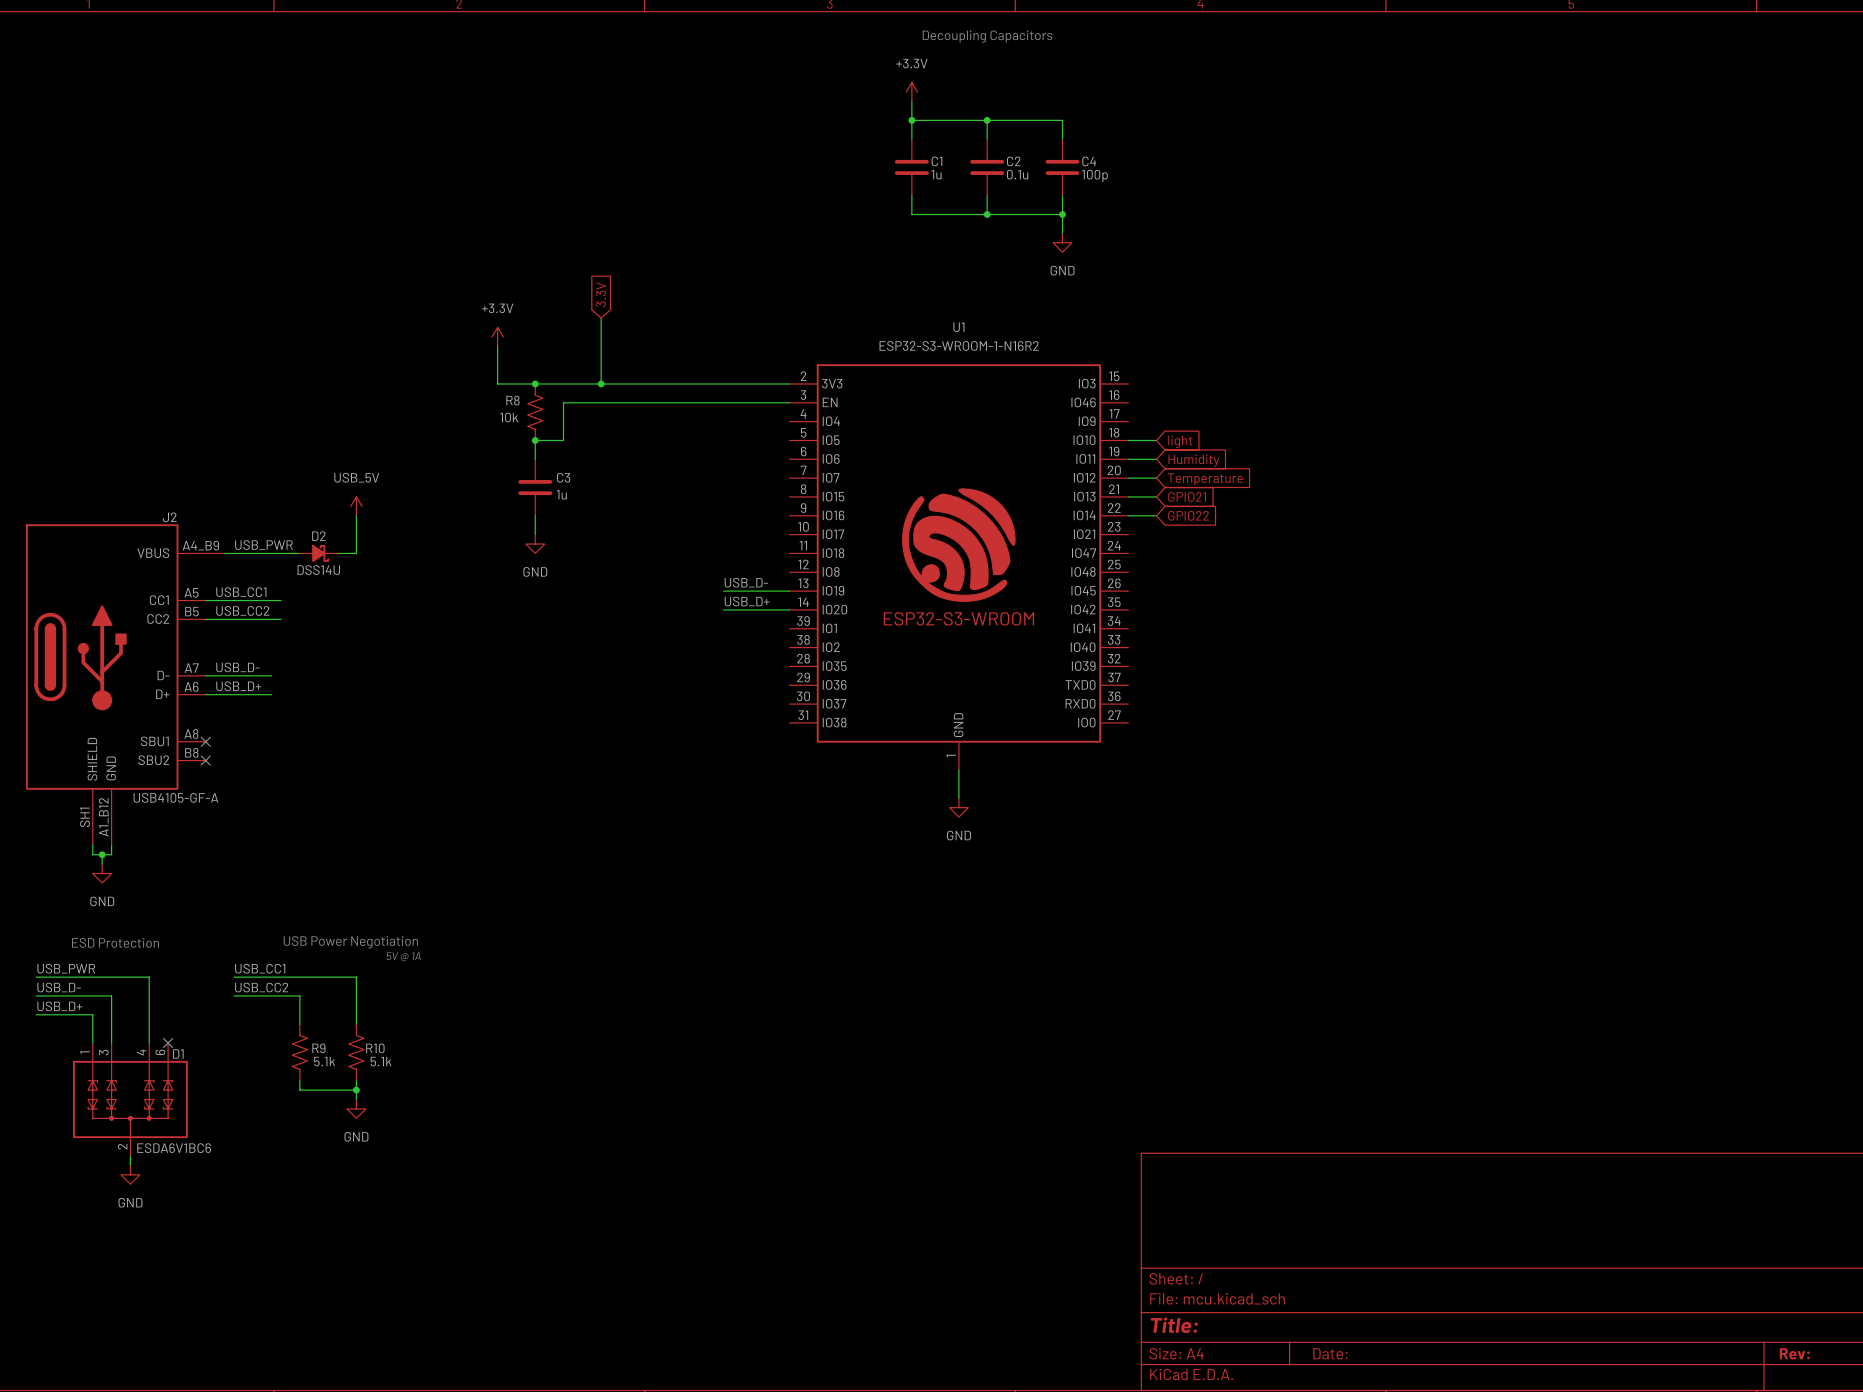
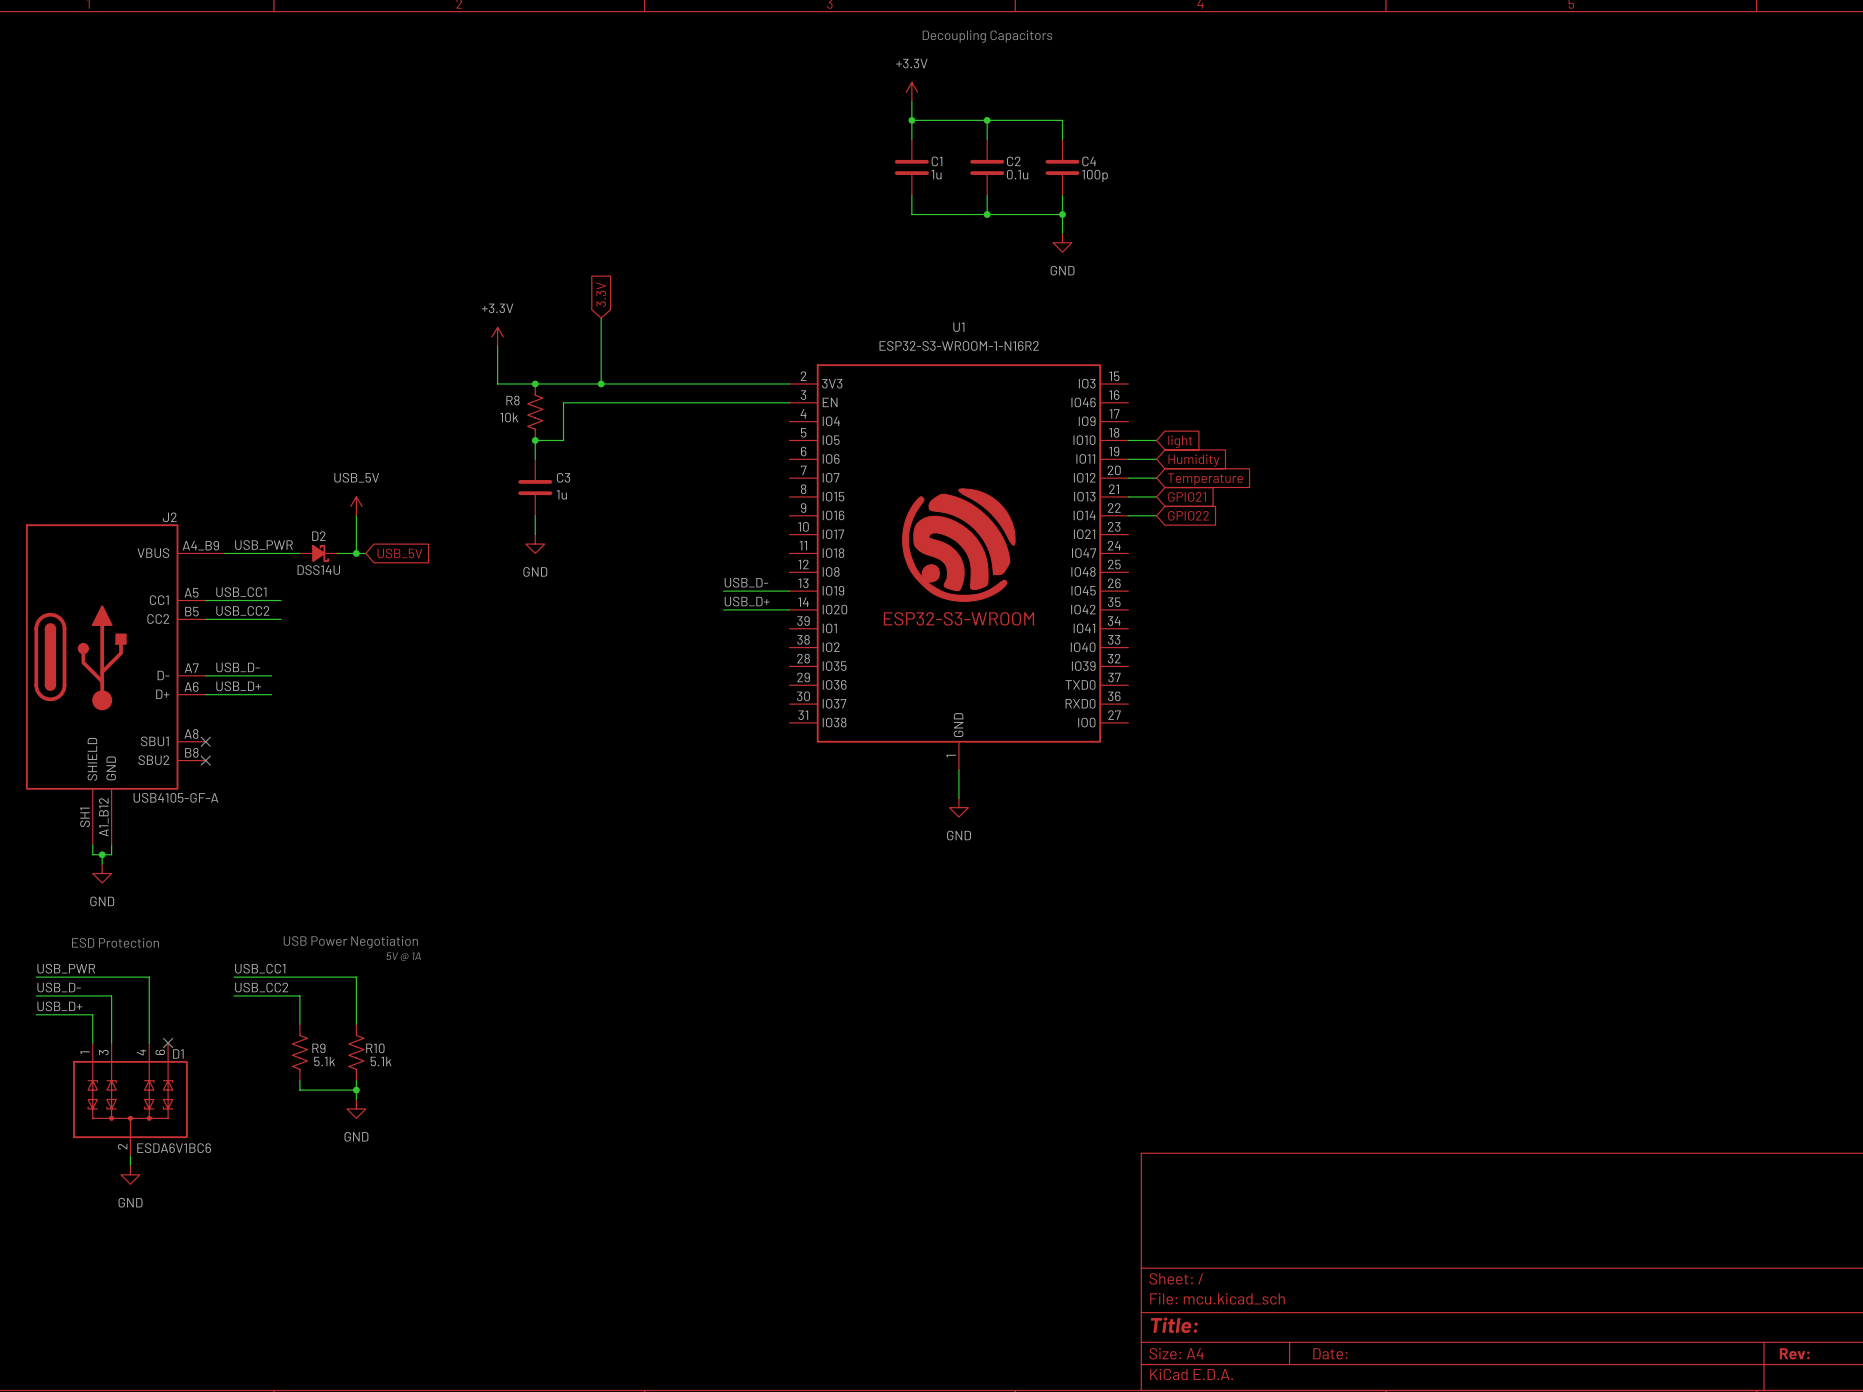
wire: none -> (356, 553) (365, 553)
junction: none -> (356, 553)
global label: none -> USB_5V (399, 553)

